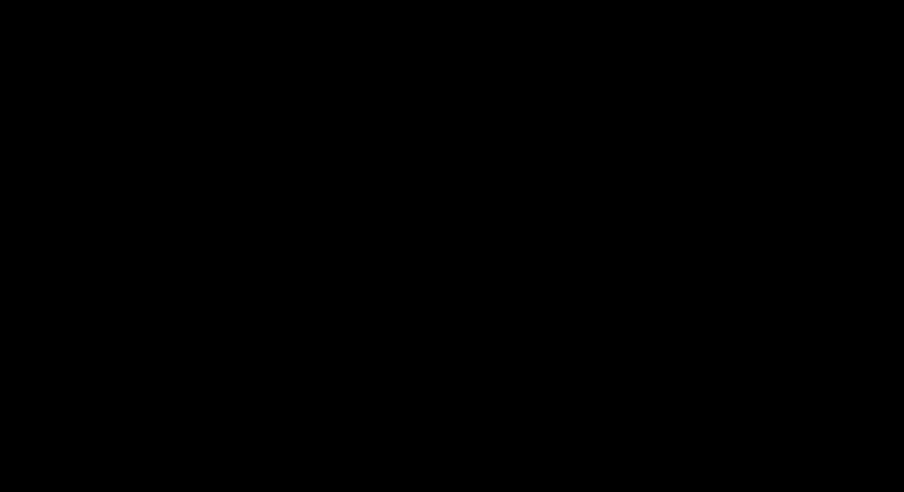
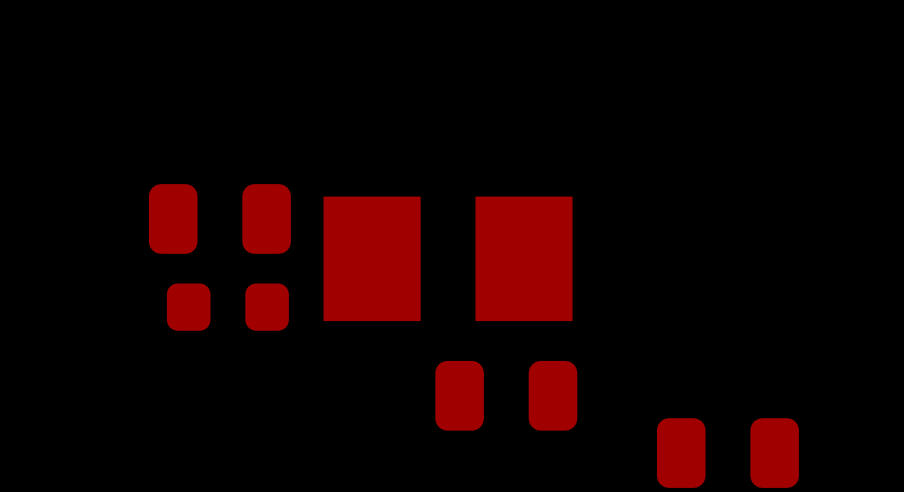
part: none -> (219, 218)
part: none -> (448, 258)
part: none -> (227, 307)
part: none -> (506, 395)
part: none -> (727, 453)

